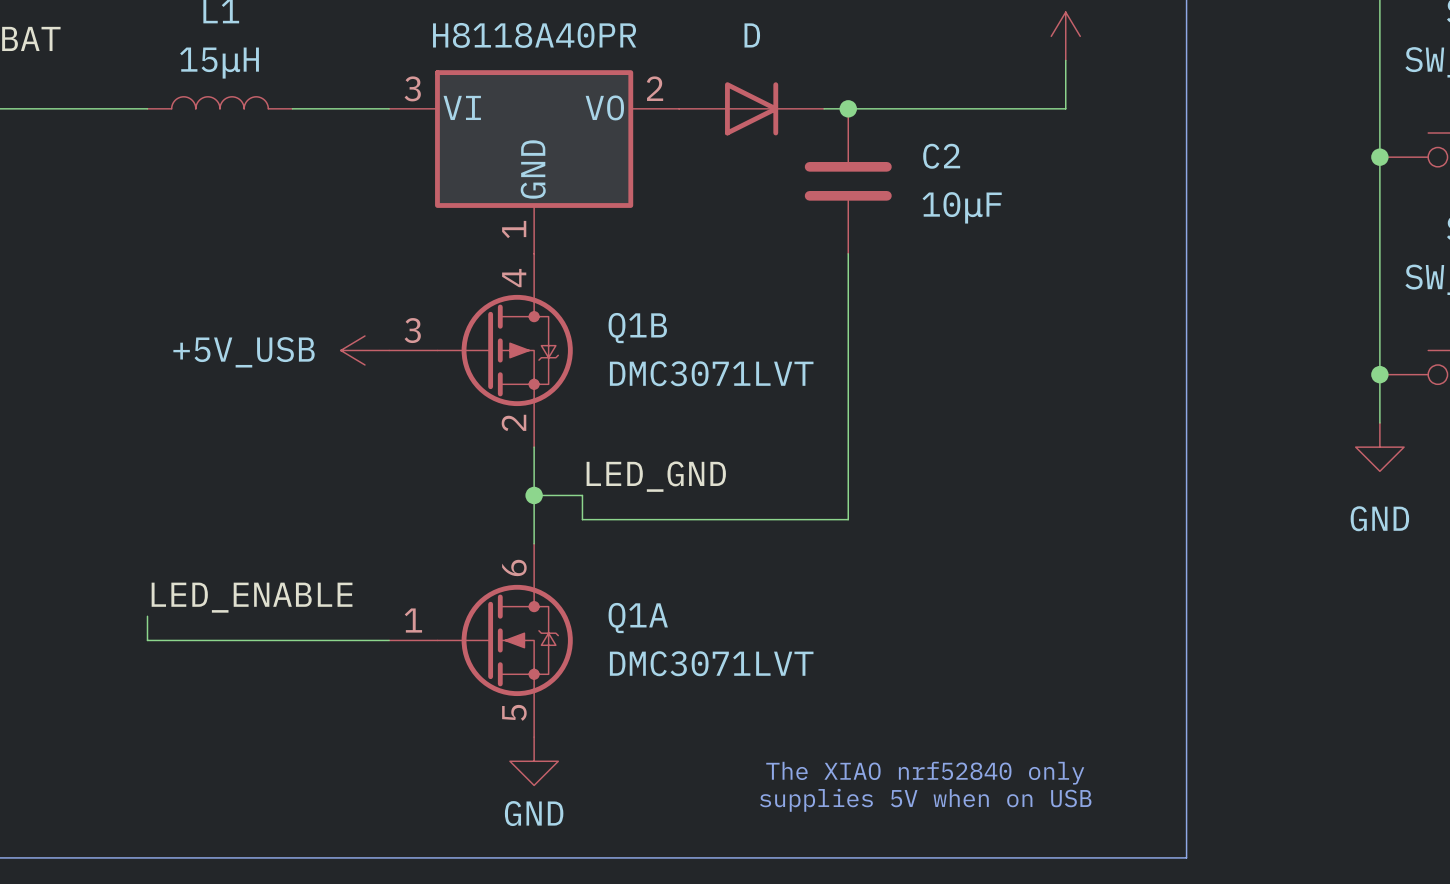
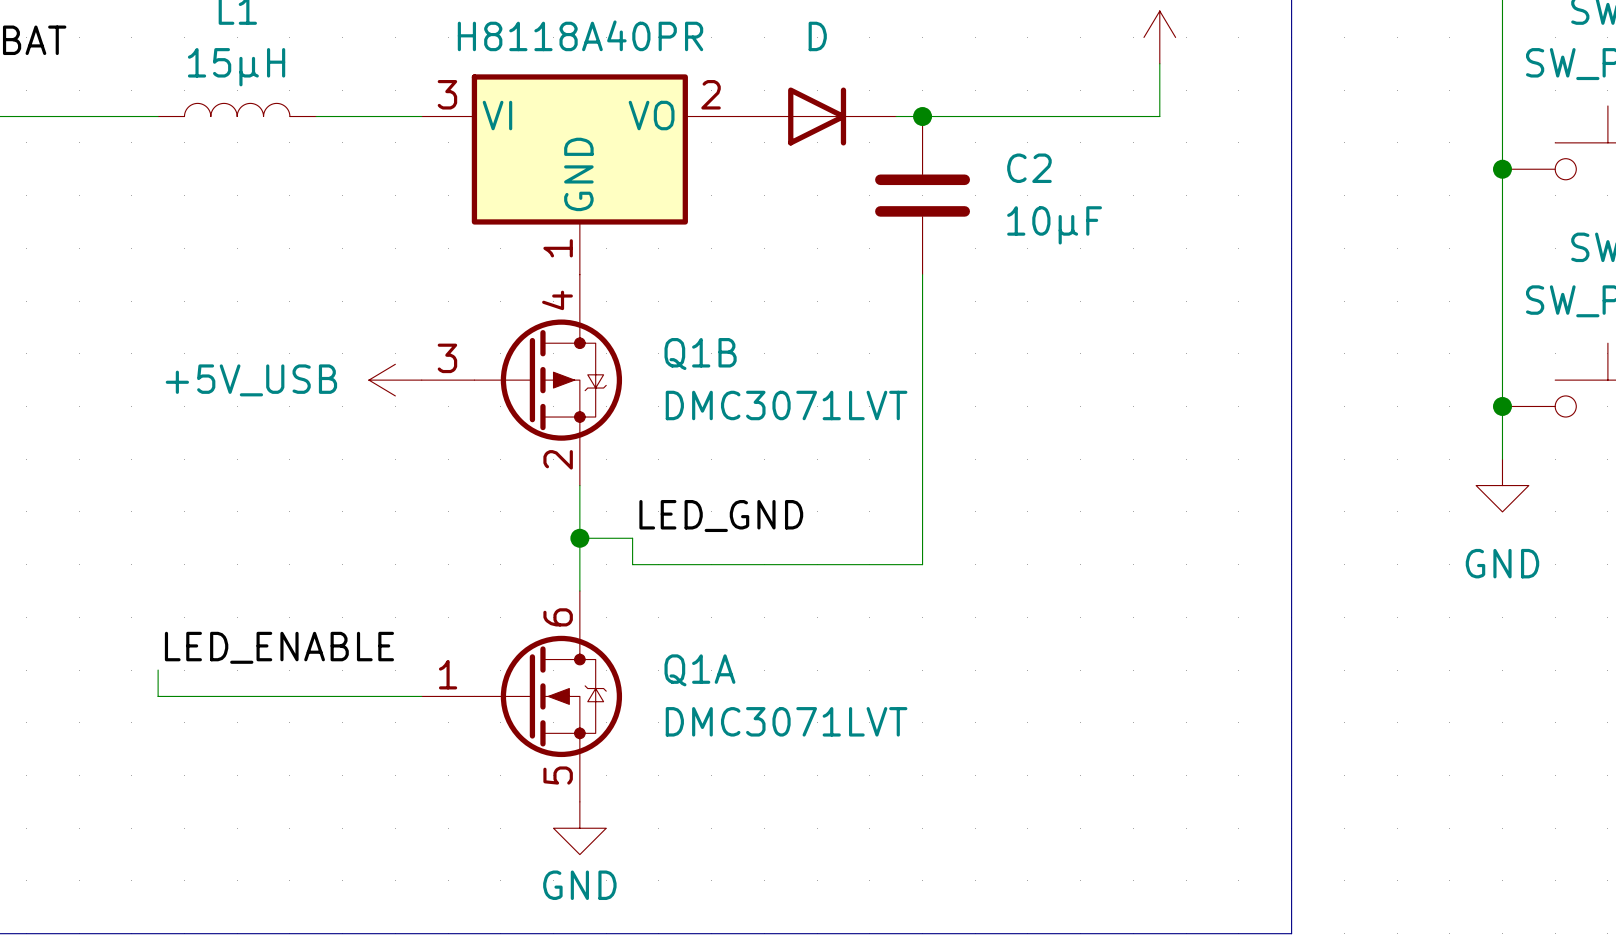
text: The XIAO nrf52840 only (925, 773) -> none
text: supplies 5V when on USB (925, 800) -> none

